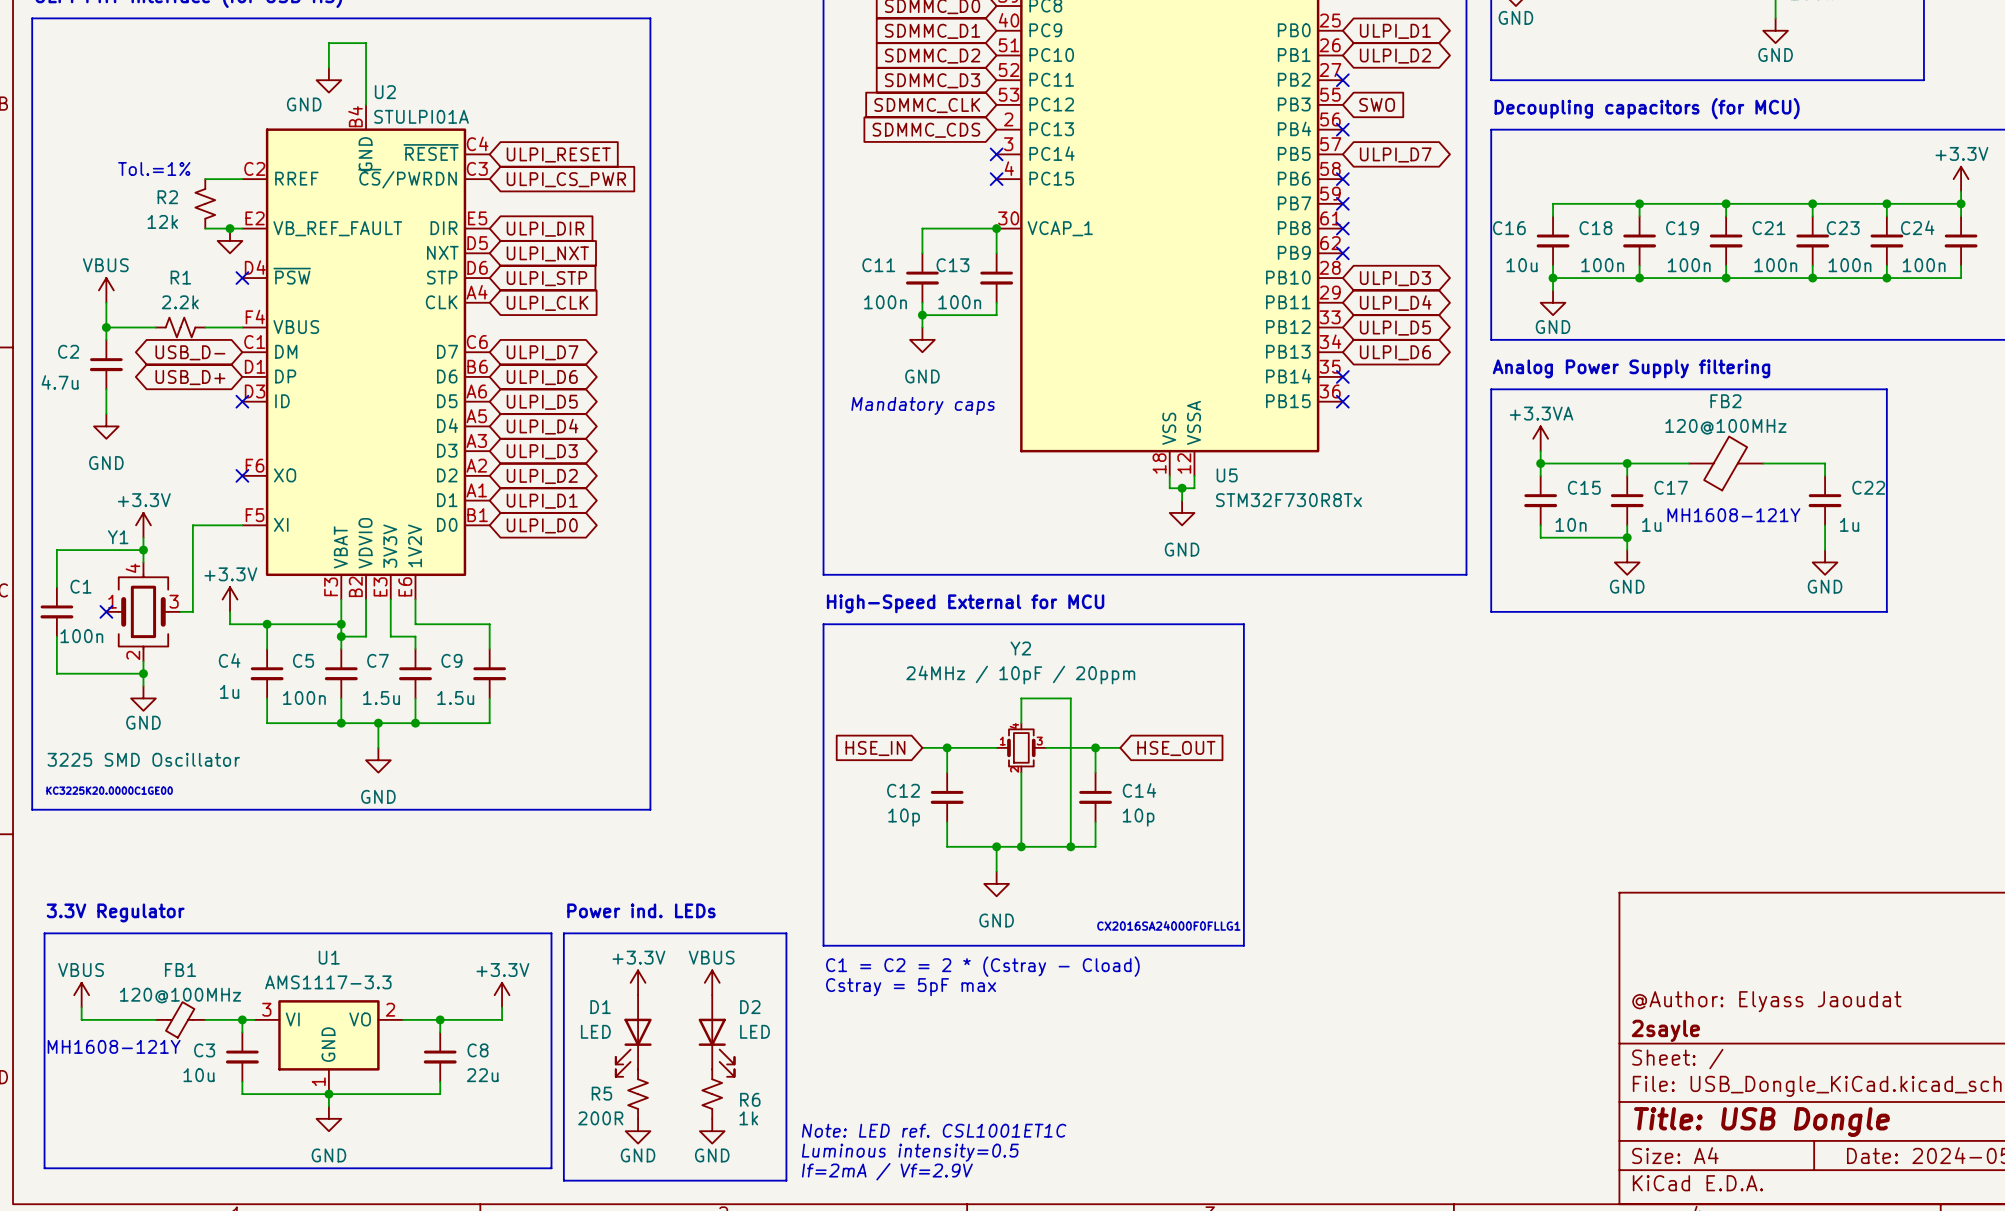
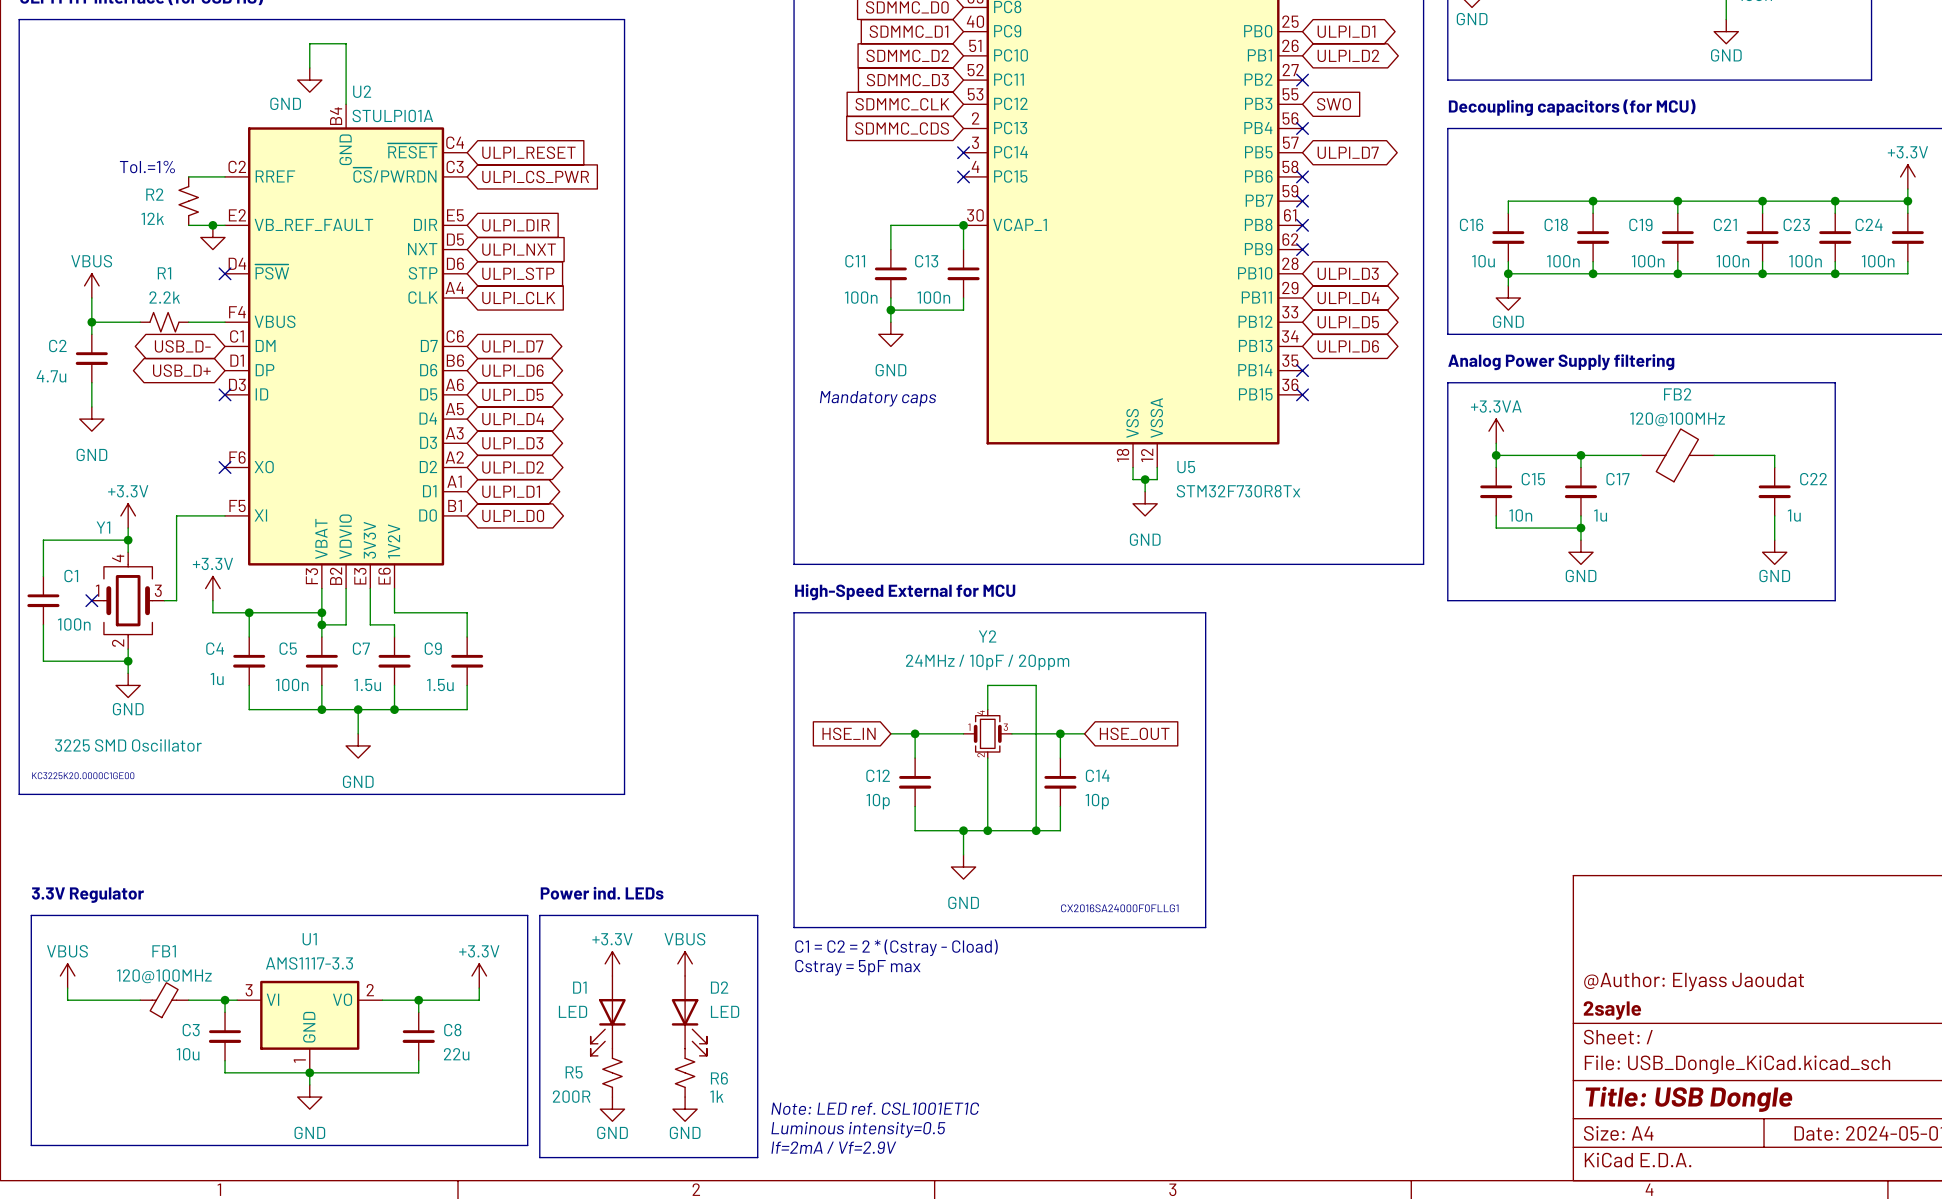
text: MH1608-121Y (1733, 515) -> none
text: MH1608-121Y (114, 1046) -> none

